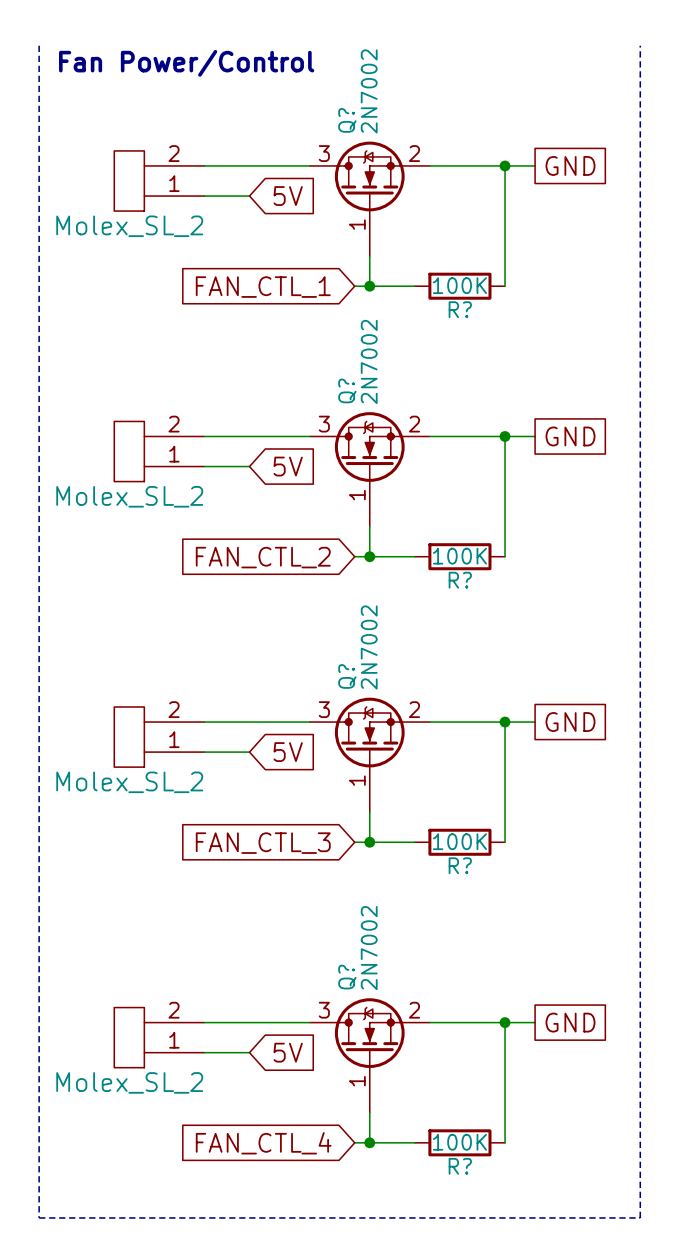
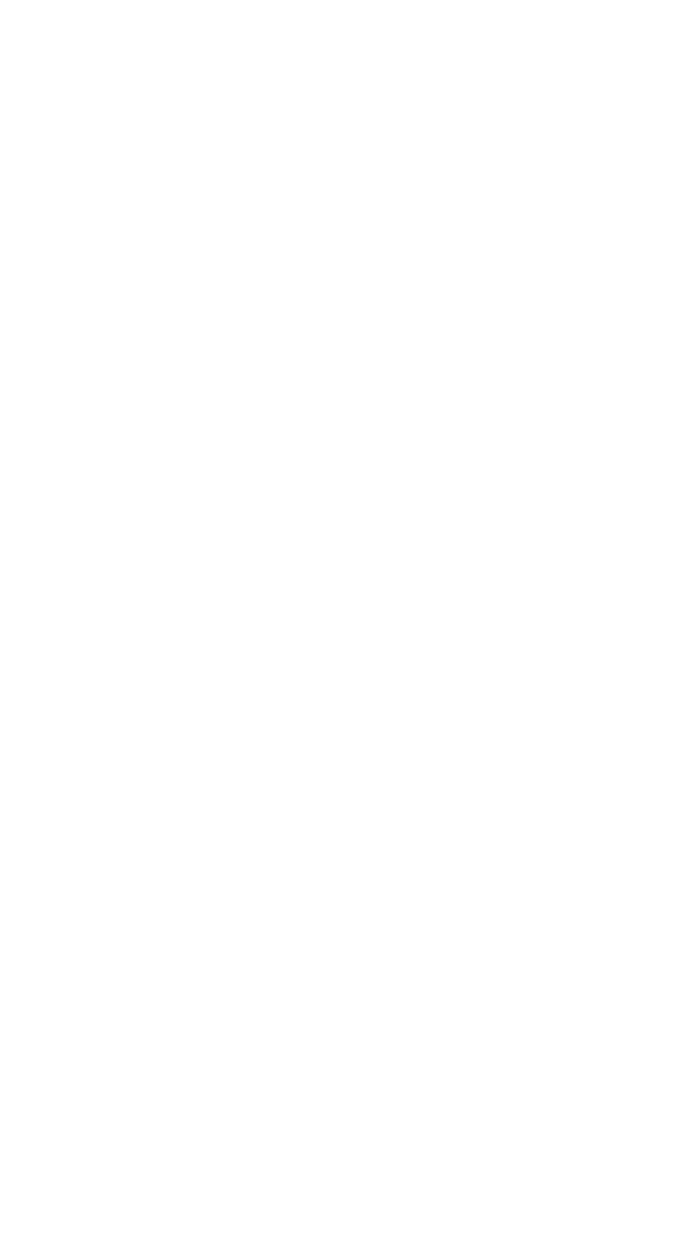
line: (39, 45) (39, 1217) (640, 1217) (640, 45) -> none
text: Fan Power/Control (186, 63) -> none
wire: (204, 165) (309, 165) -> none
wire: (429, 165) (535, 165) -> none
wire: (505, 165) (505, 286) -> none
junction: (505, 165) -> none
global label: GND (570, 165) -> none
part: Molex_SL_2 (159, 181) -> none
wire: (204, 196) (249, 196) -> none
global label: 5V (288, 196) -> none
Q?: 2N7002 (369, 198) -> none
wire: (369, 256) (369, 286) -> none
wire: (354, 286) (414, 286) -> none
junction: (369, 286) -> none
R?: 100K (459, 286) -> none
global label: FAN_CTL_1 (263, 287) -> none
wire: (204, 436) (309, 436) -> none
wire: (429, 436) (535, 436) -> none
wire: (505, 436) (505, 556) -> none
junction: (505, 436) -> none
global label: GND (570, 436) -> none
part: Molex_SL_2 (159, 451) -> none
wire: (204, 466) (249, 466) -> none
global label: 5V (288, 466) -> none
Q?: 2N7002 (369, 469) -> none
wire: (369, 526) (369, 556) -> none
wire: (354, 556) (414, 556) -> none
junction: (369, 556) -> none
R?: 100K (459, 556) -> none
global label: FAN_CTL_2 (263, 557) -> none
wire: (204, 722) (309, 722) -> none
wire: (429, 722) (535, 722) -> none
wire: (505, 722) (505, 842) -> none
junction: (505, 722) -> none
global label: GND (570, 722) -> none
part: Molex_SL_2 (159, 737) -> none
wire: (204, 752) (249, 752) -> none
global label: 5V (288, 752) -> none
Q?: 2N7002 (369, 754) -> none
wire: (369, 812) (369, 842) -> none
wire: (354, 842) (414, 842) -> none
junction: (369, 842) -> none
R?: 100K (459, 842) -> none
global label: FAN_CTL_3 (263, 843) -> none
wire: (204, 1022) (309, 1022) -> none
wire: (429, 1022) (535, 1022) -> none
wire: (505, 1022) (505, 1142) -> none
junction: (505, 1022) -> none
global label: GND (570, 1022) -> none
part: Molex_SL_2 (159, 1037) -> none
wire: (204, 1052) (249, 1052) -> none
global label: 5V (288, 1052) -> none
Q?: 2N7002 (369, 1055) -> none
wire: (369, 1112) (369, 1142) -> none
wire: (354, 1142) (414, 1142) -> none
junction: (369, 1142) -> none
R?: 100K (459, 1142) -> none
global label: FAN_CTL_4 (263, 1143) -> none

